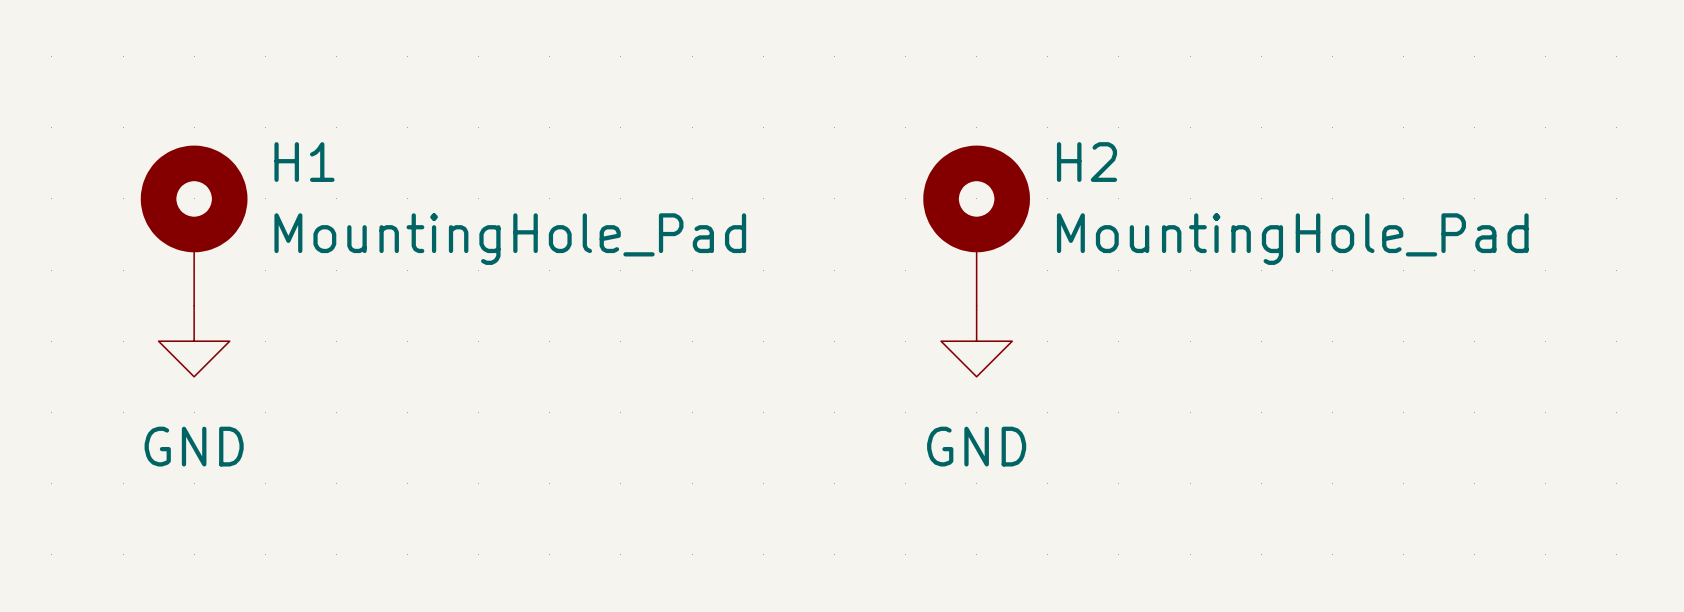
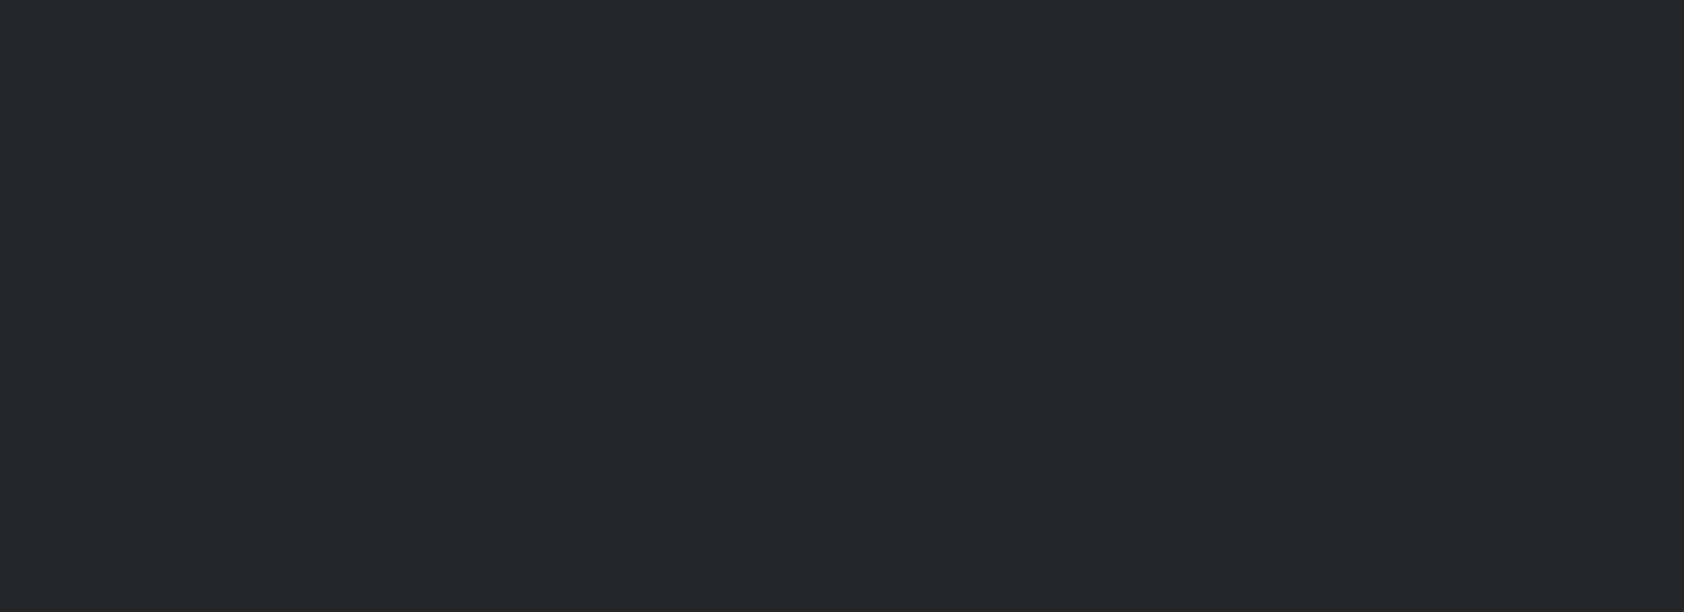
H1: MountingHole_Pad (194, 225) -> none
H2: MountingHole_Pad (976, 225) -> none
power symbol: GND (194, 341) -> none
power symbol: GND (976, 341) -> none

